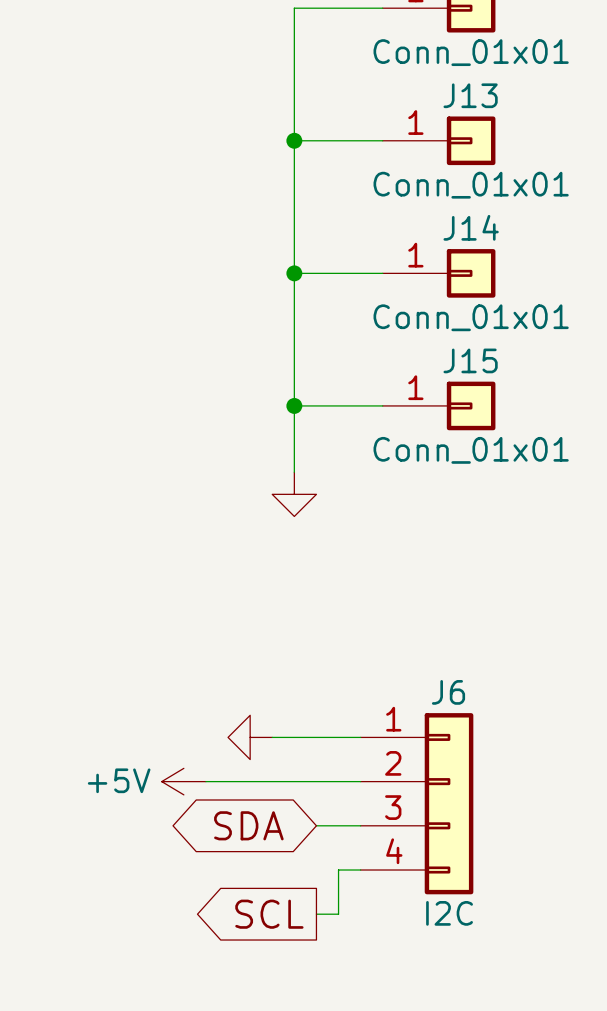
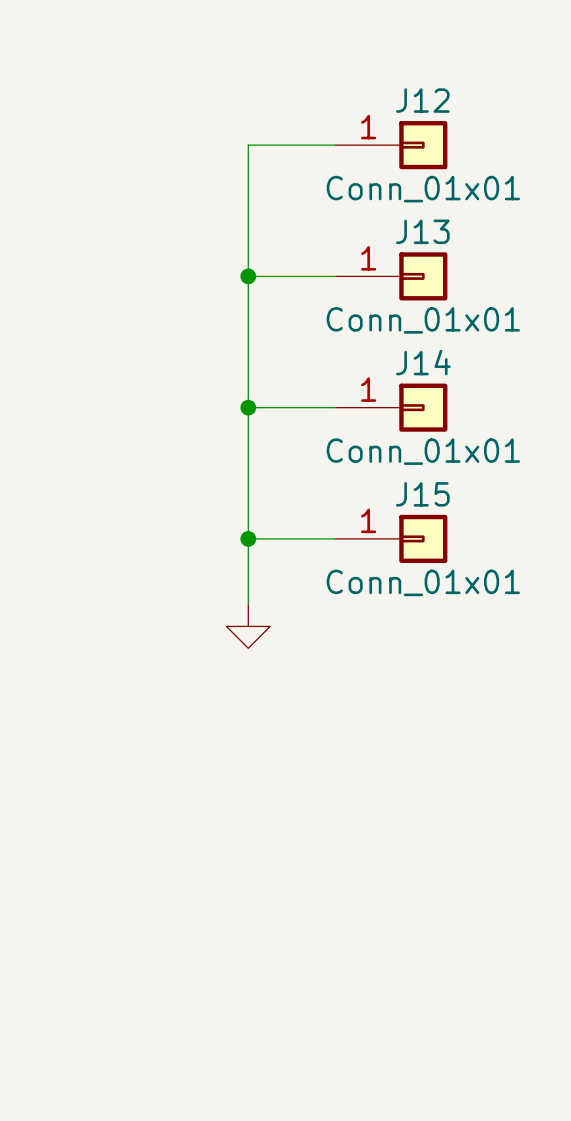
power symbol: (250, 737) -> none
wire: (272, 737) (360, 737) -> none
power symbol: +5V (183, 781) -> none
wire: (205, 781) (360, 781) -> none
J6: I2C (416, 803) -> none
global label: SDA (248, 825) -> none
wire: (316, 825) (360, 825) -> none
wire: (360, 870) (338, 870) (338, 914) (316, 914) -> none
global label: SCL (269, 914) -> none

